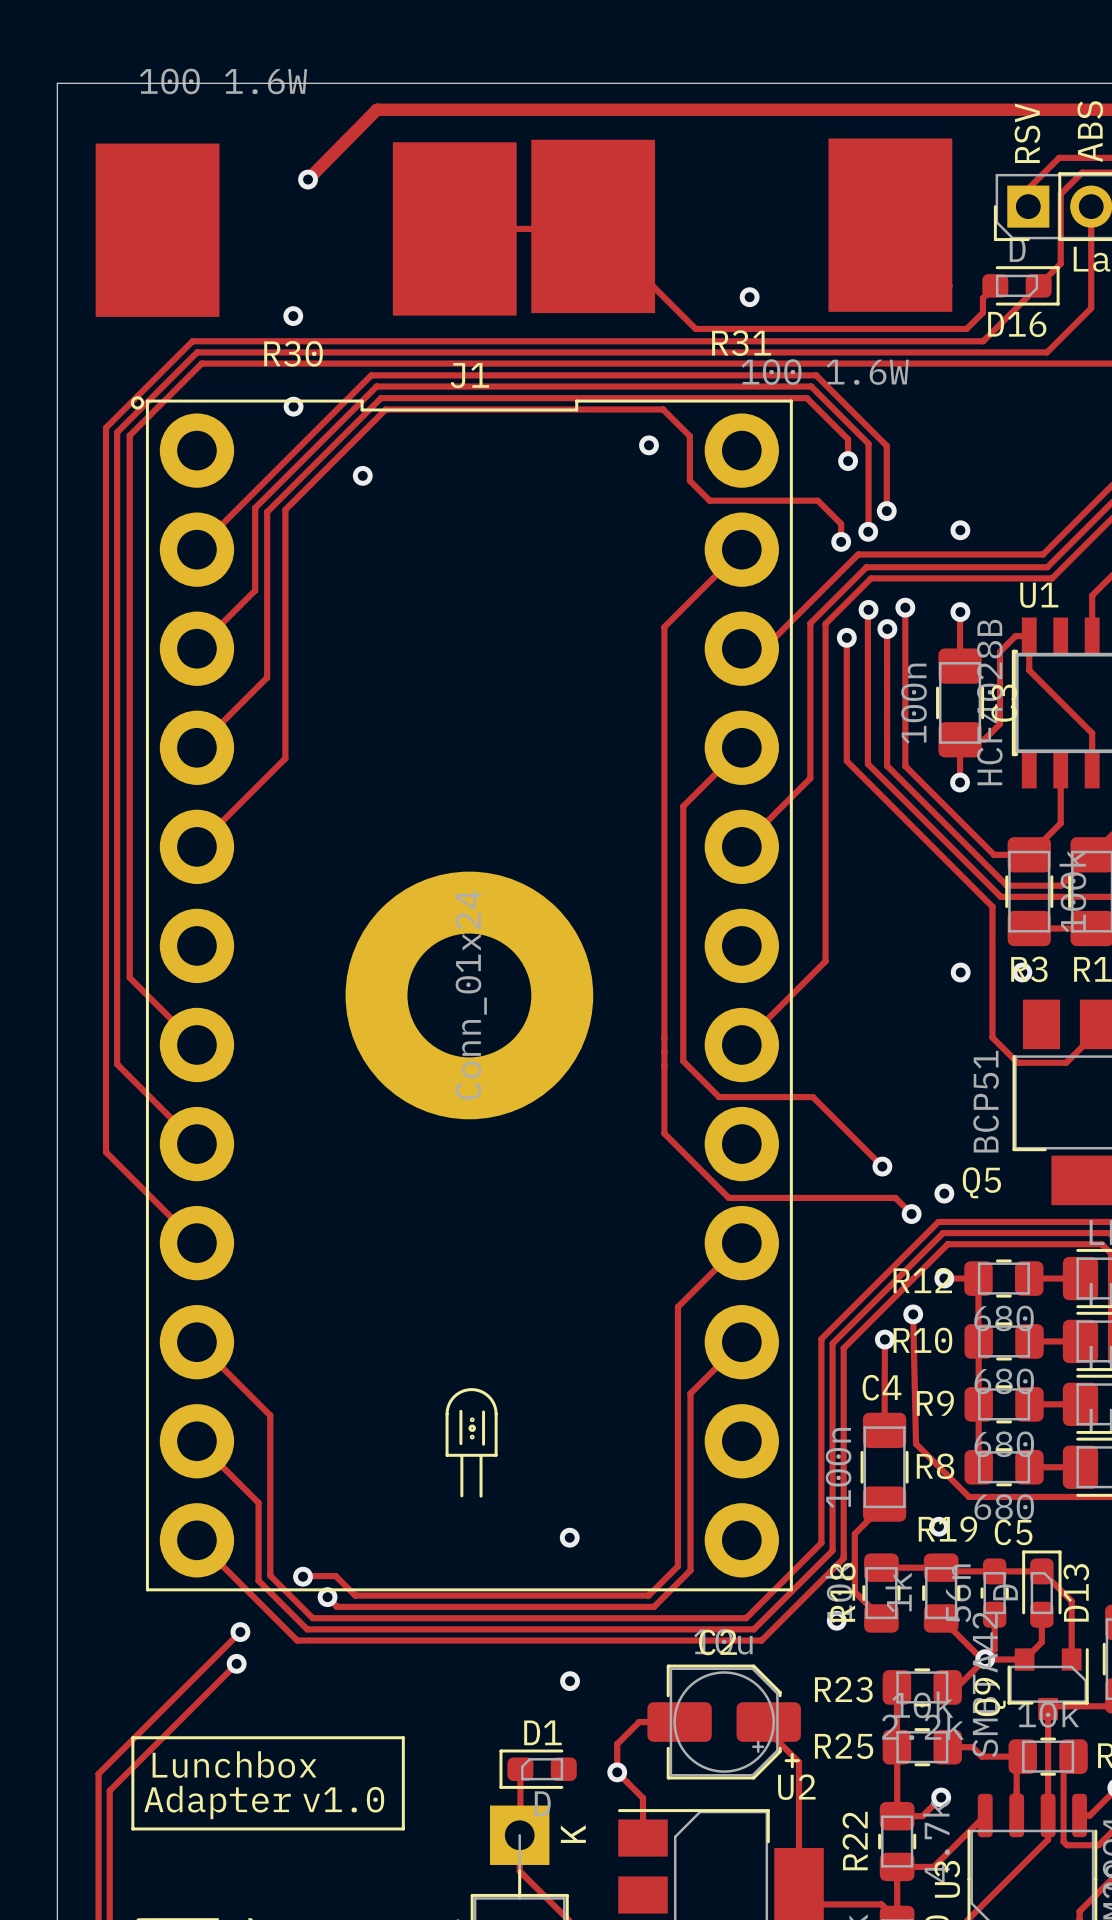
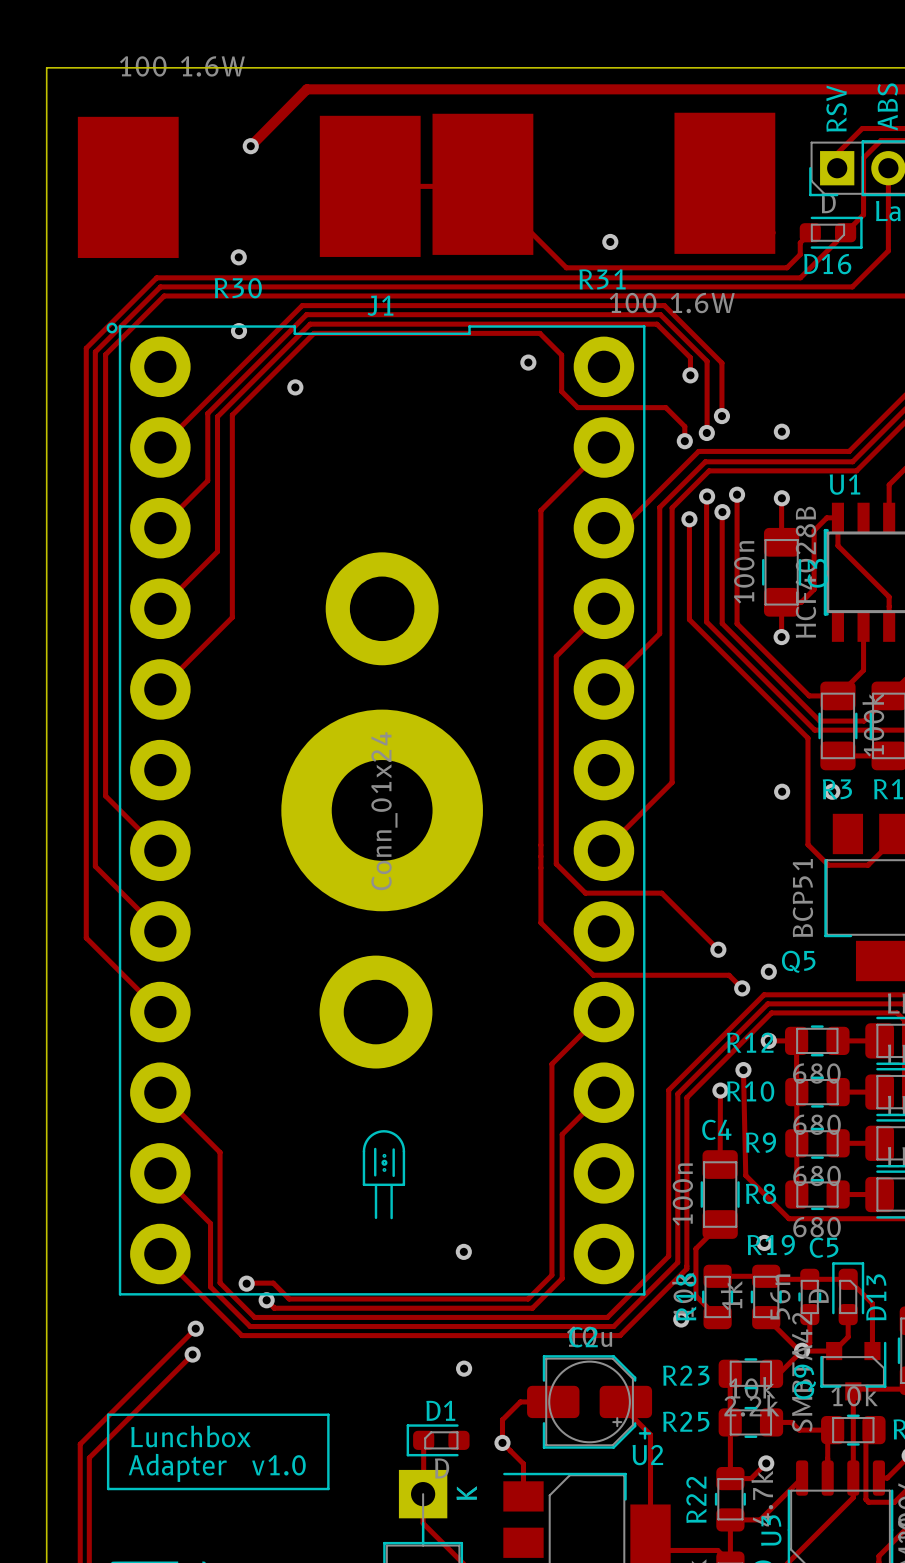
J1 footprint: [145, 399, 793, 1592] -> [118, 325, 646, 1296]

